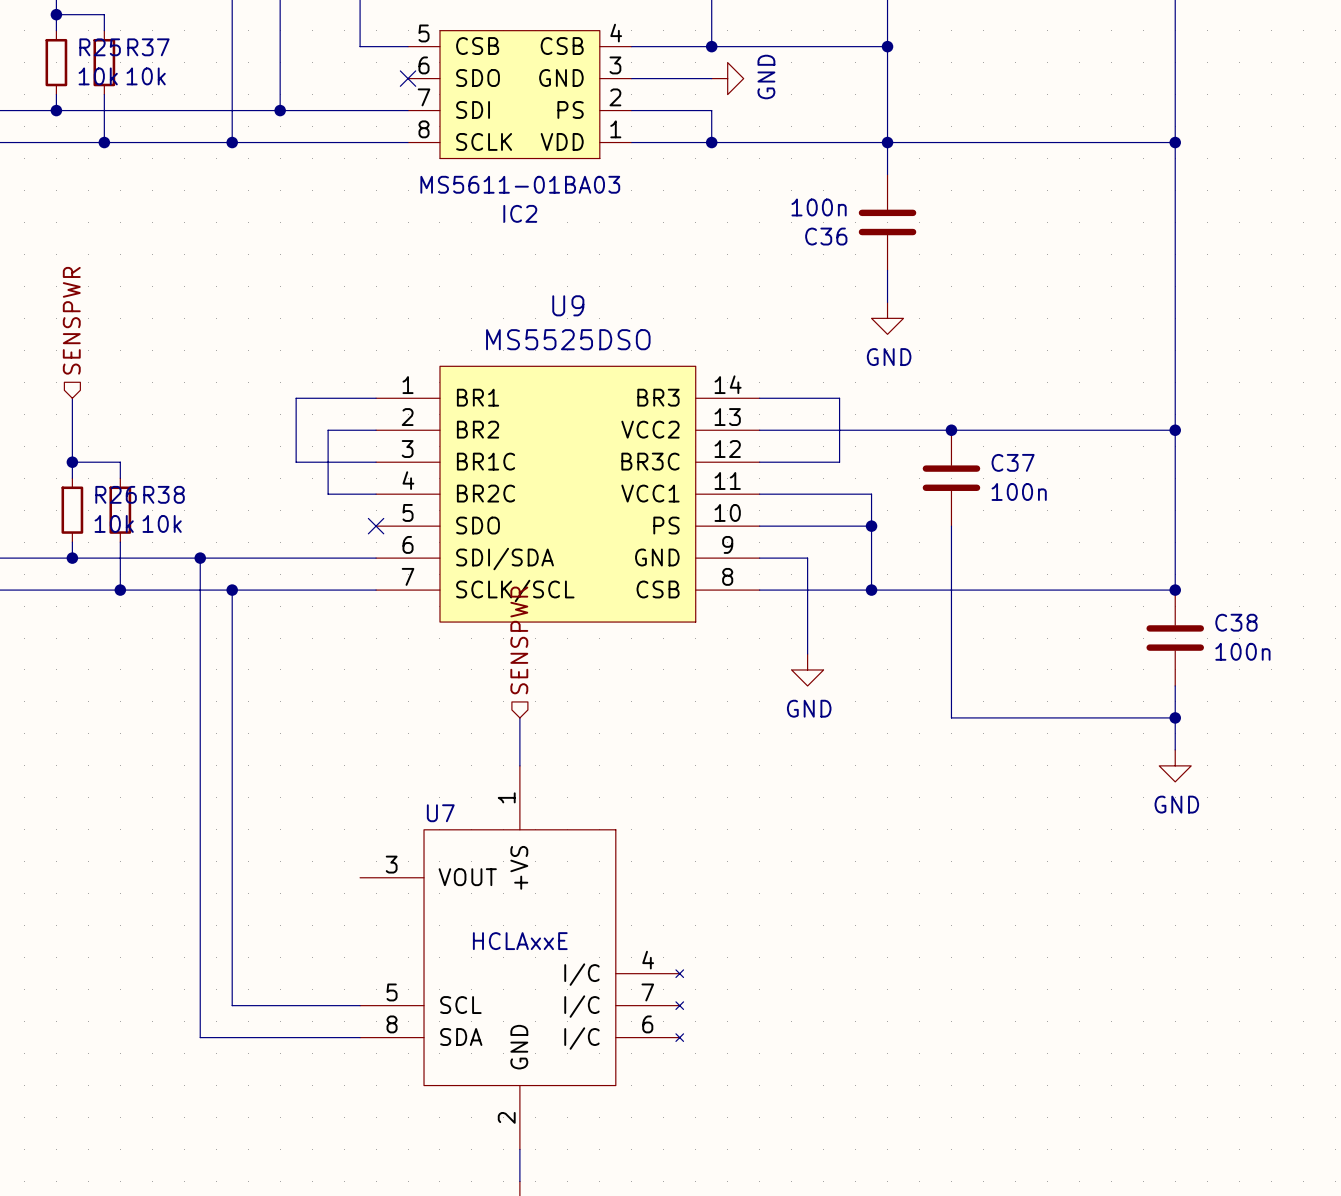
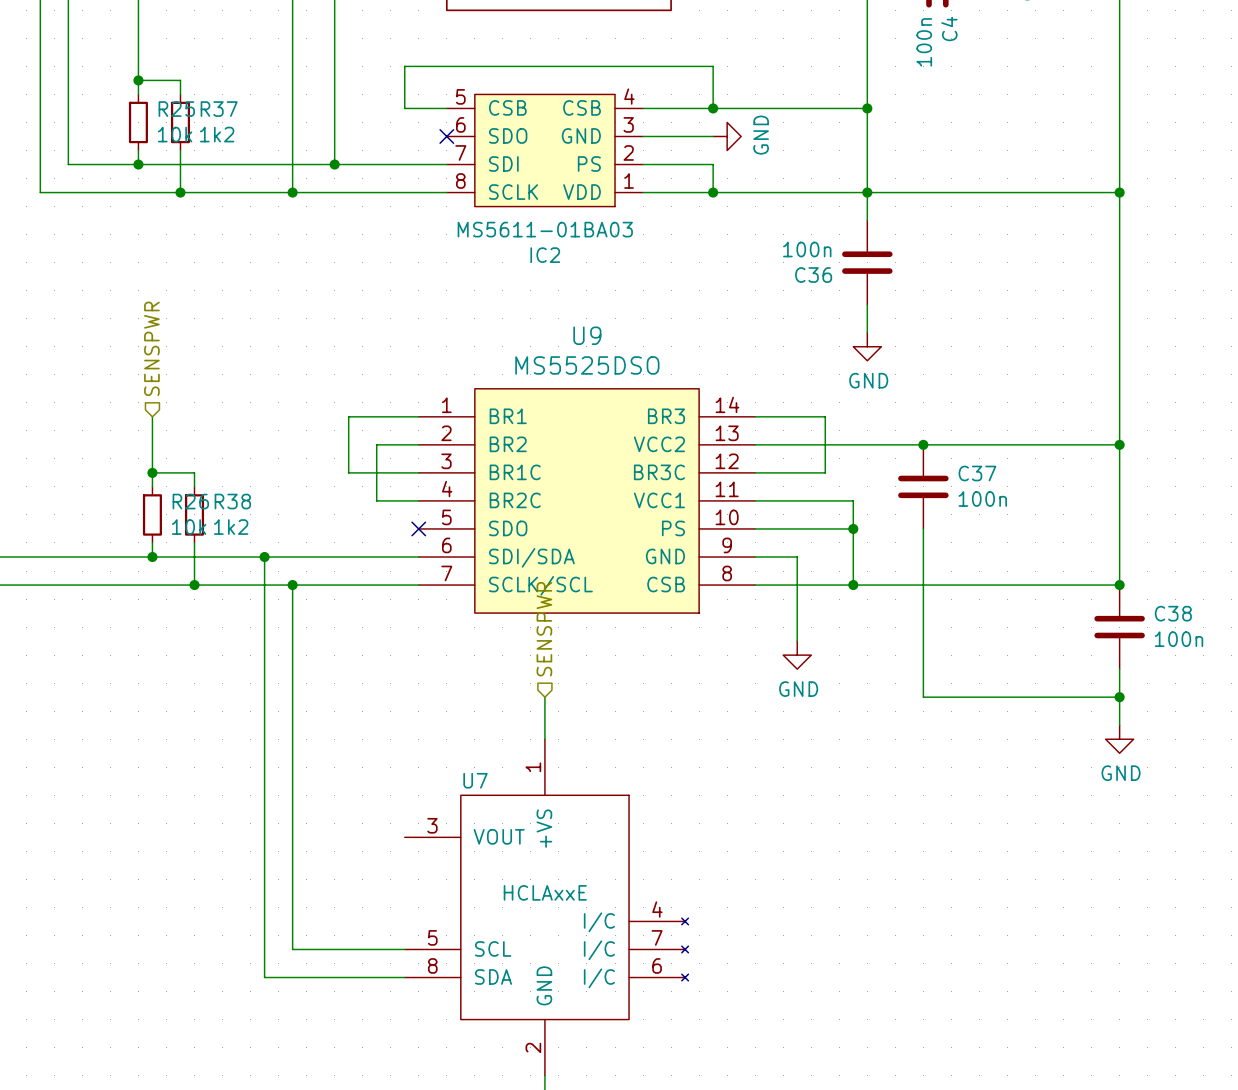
R37 value: 10k (146, 76) -> 1k2 (217, 134)
R38 value: 10k (162, 523) -> 1k2 (231, 527)

